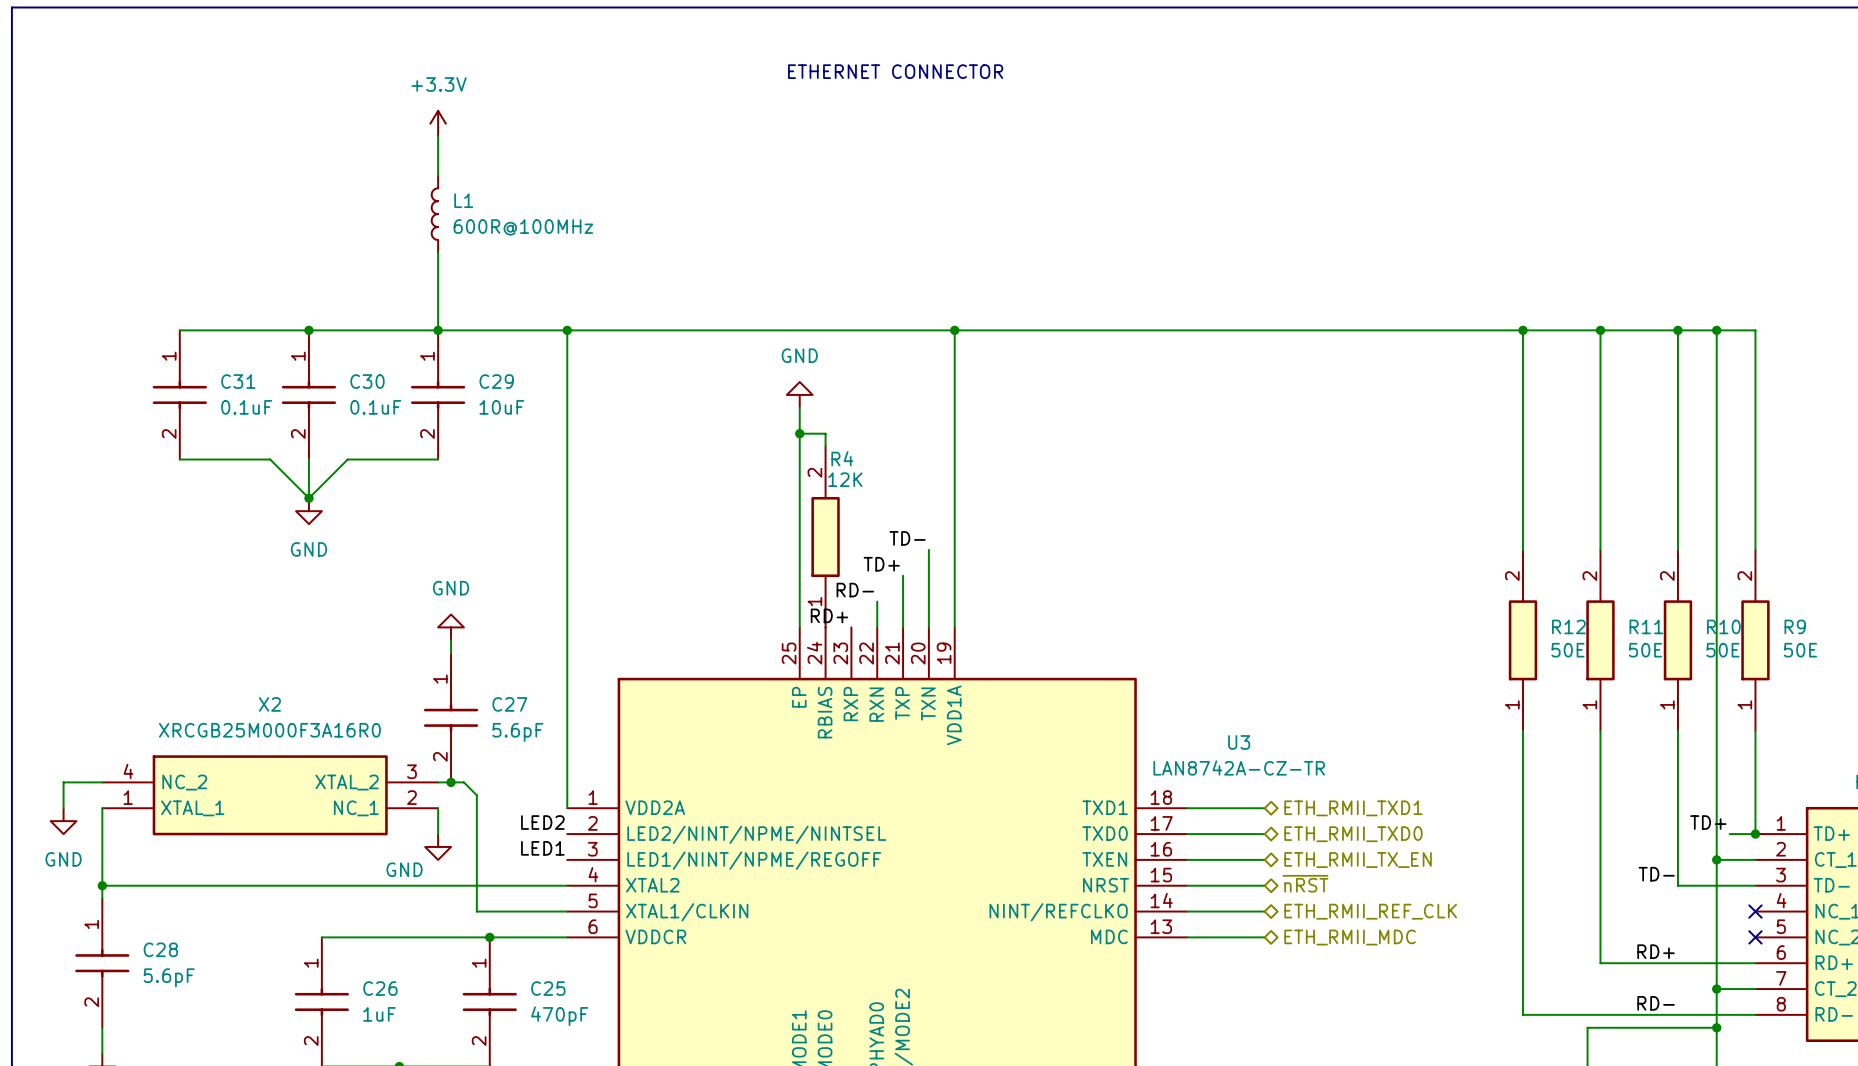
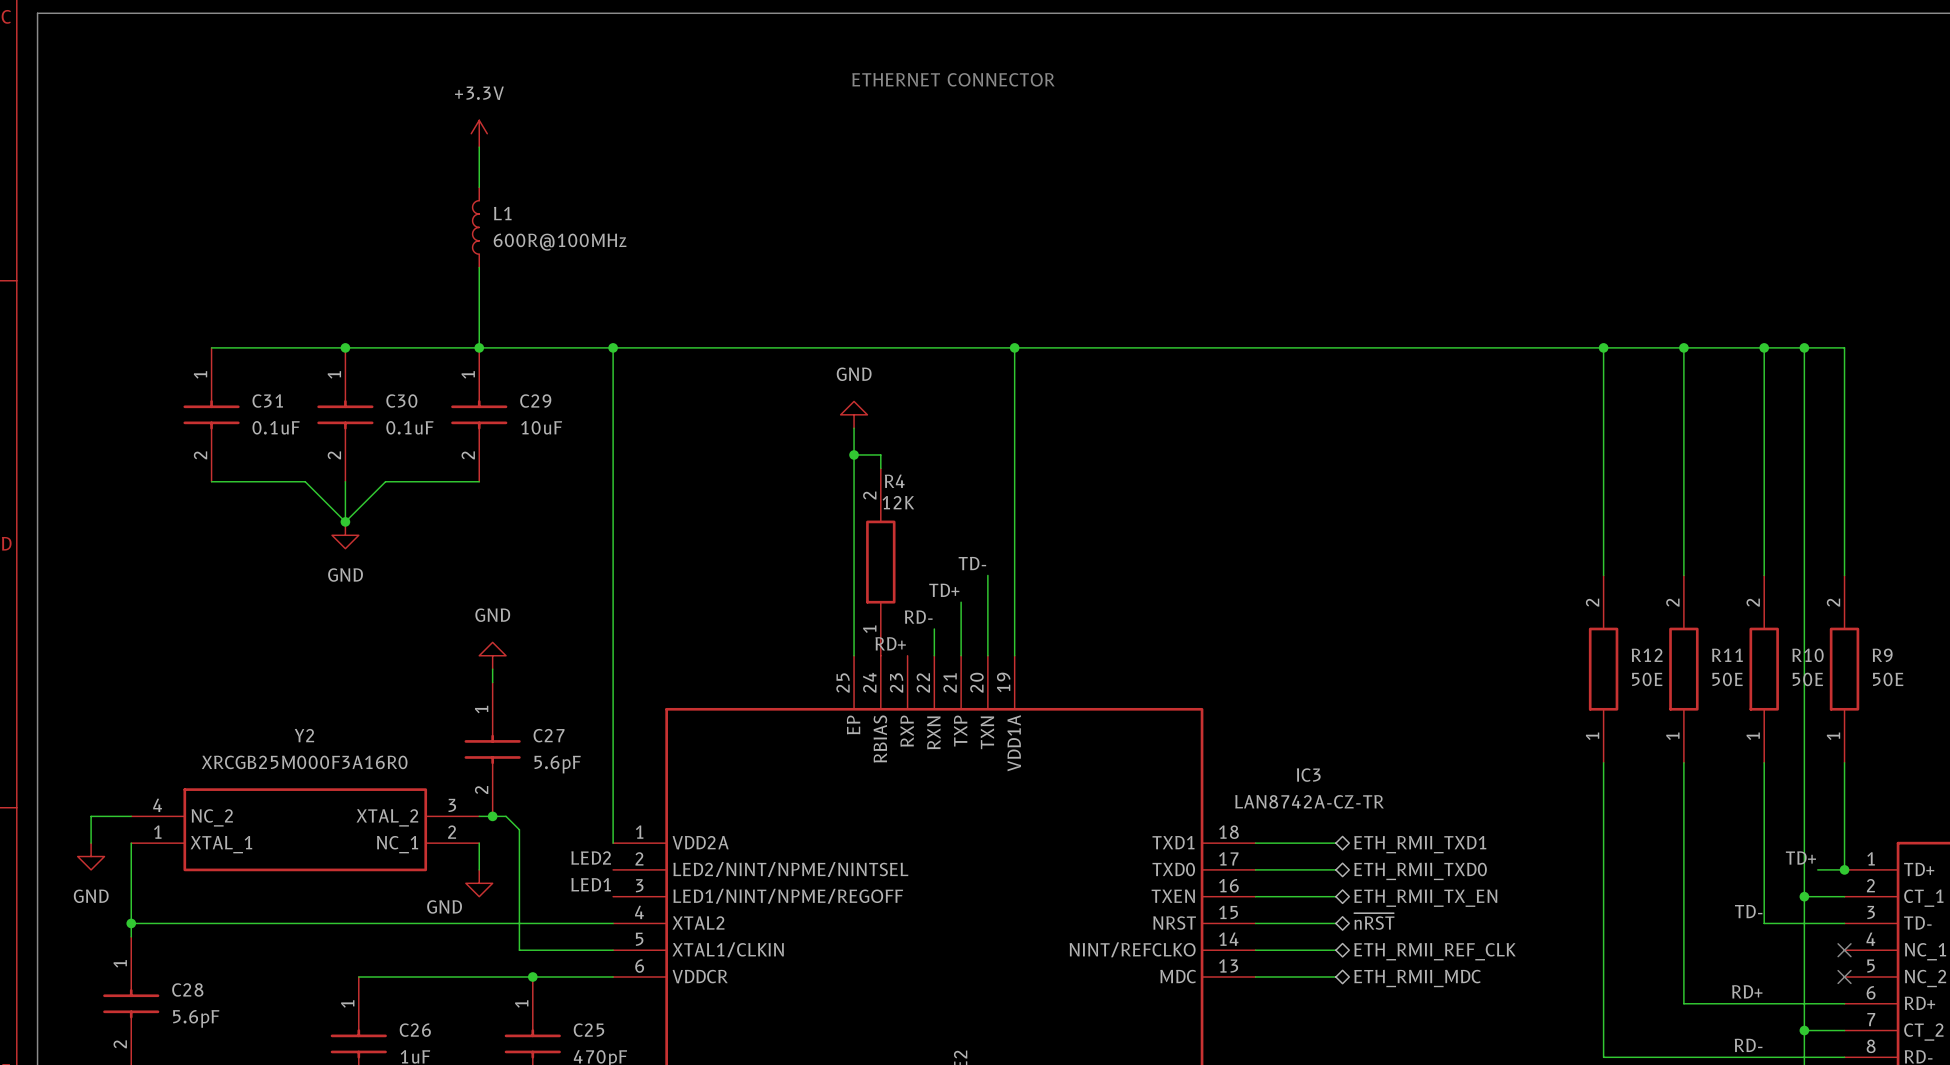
X2 name: X2 (269, 704) -> Y2 (304, 735)
U3 name: U3 (1239, 742) -> IC3 (1308, 775)

